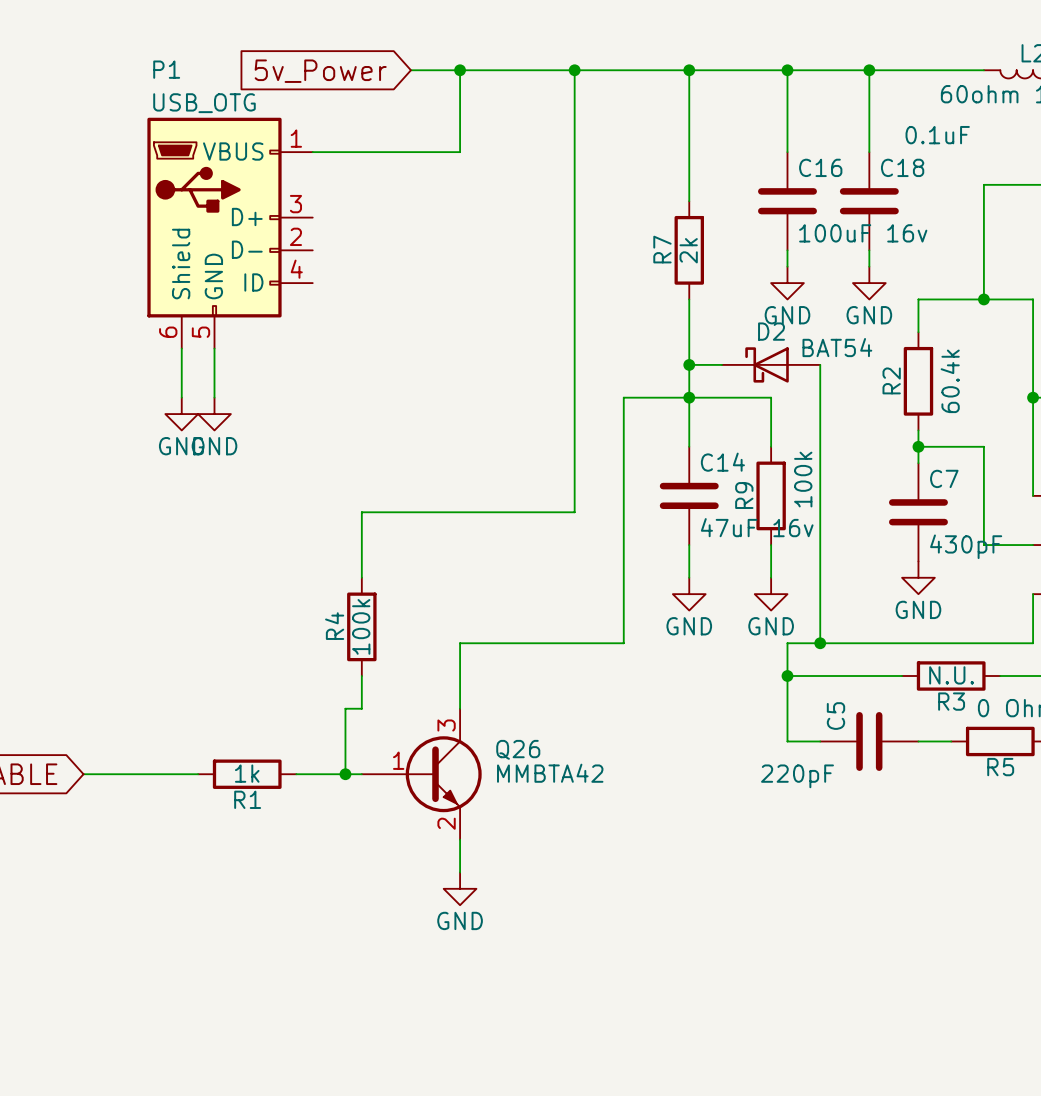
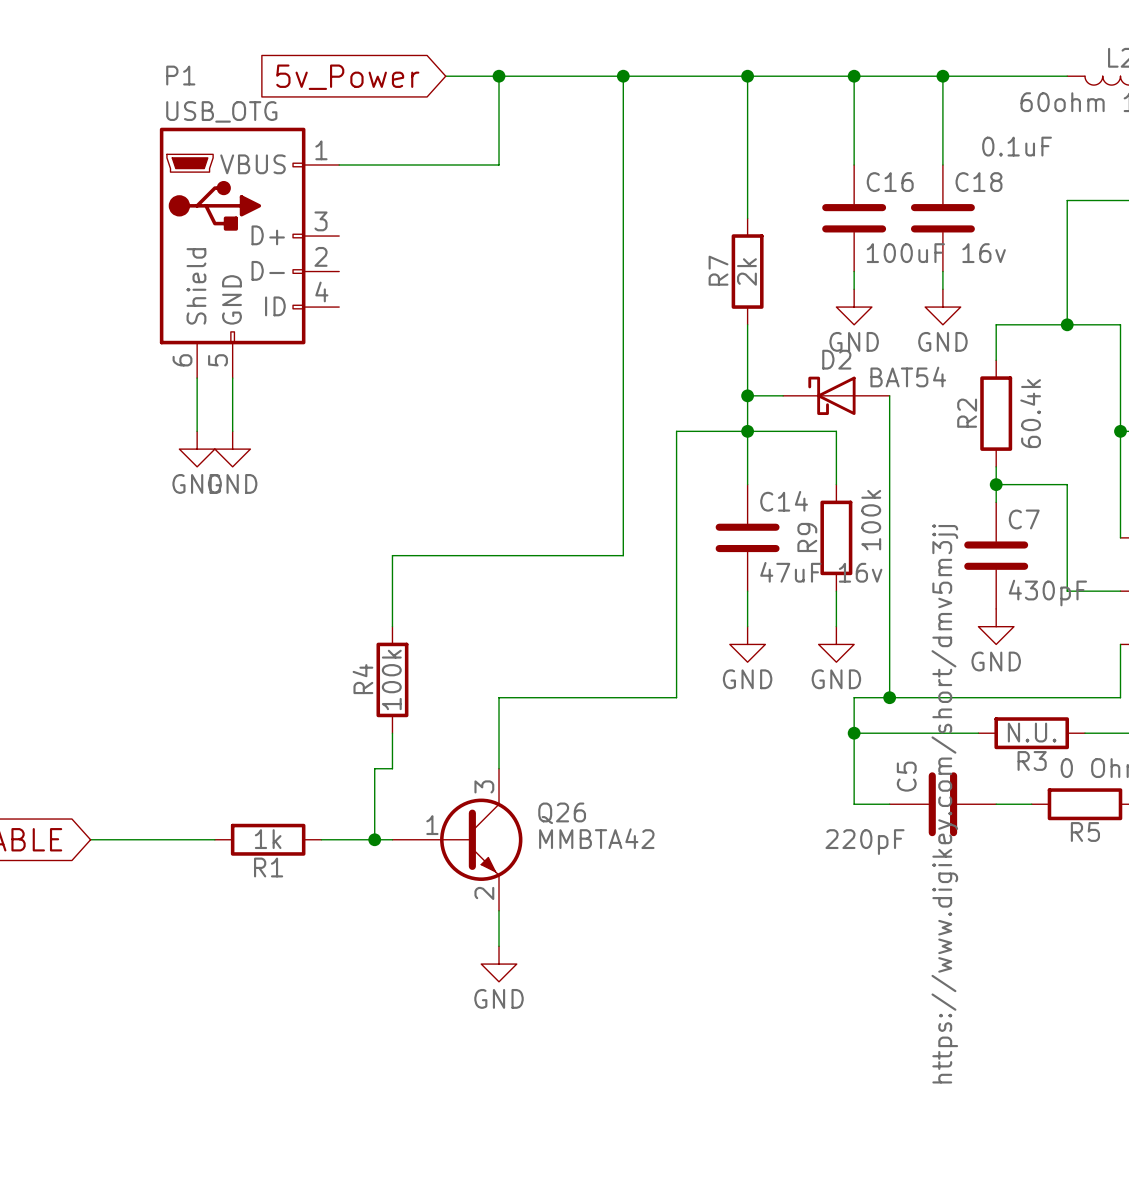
C5 text: none -> https://www.digikey.com/short/dmv5m3jj (944, 803)

